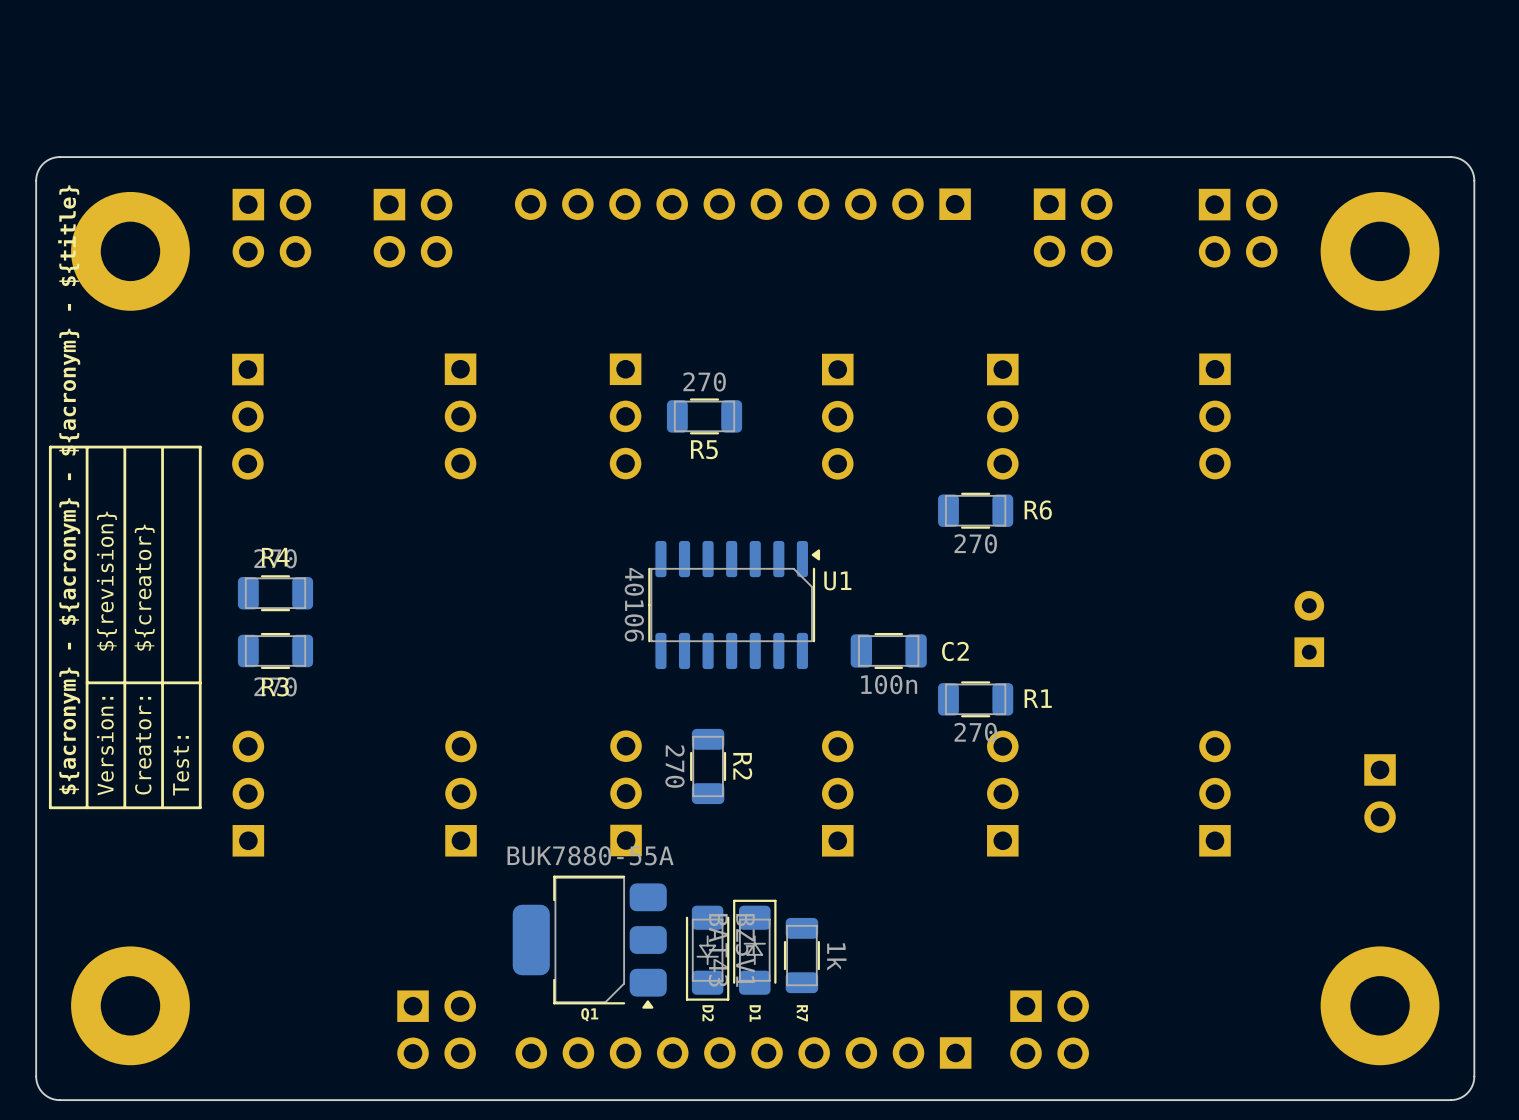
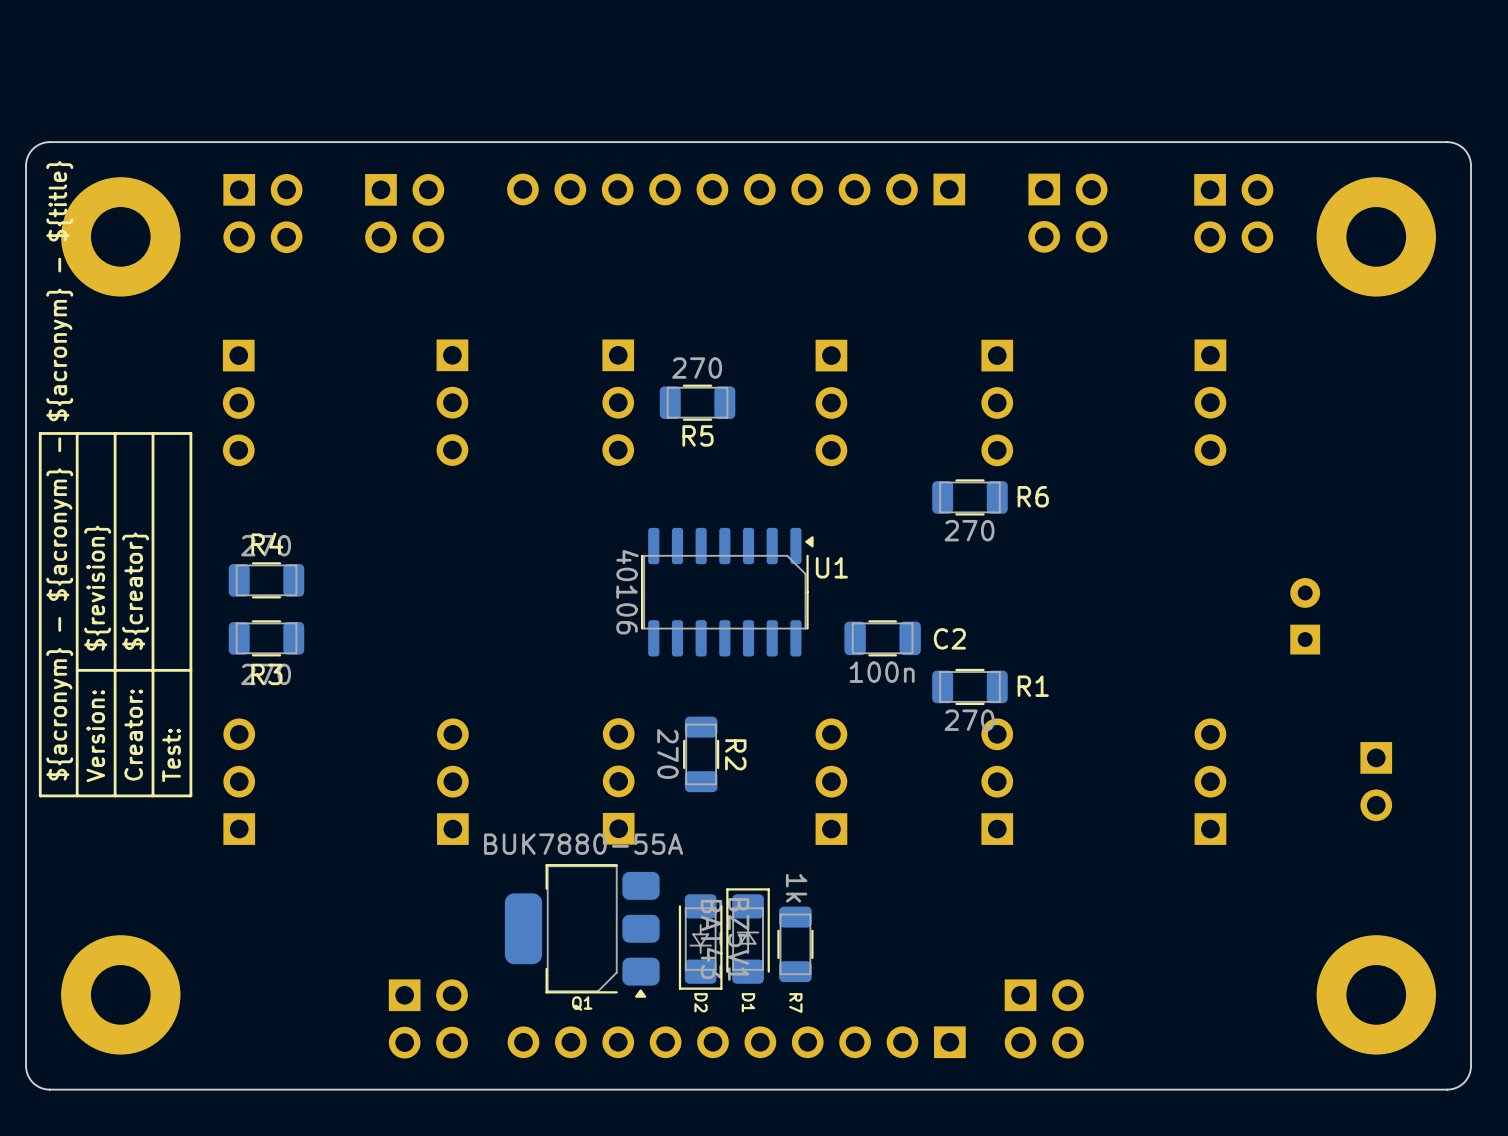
R7 value position: 1k (836, 956) -> 1k (796, 888)

